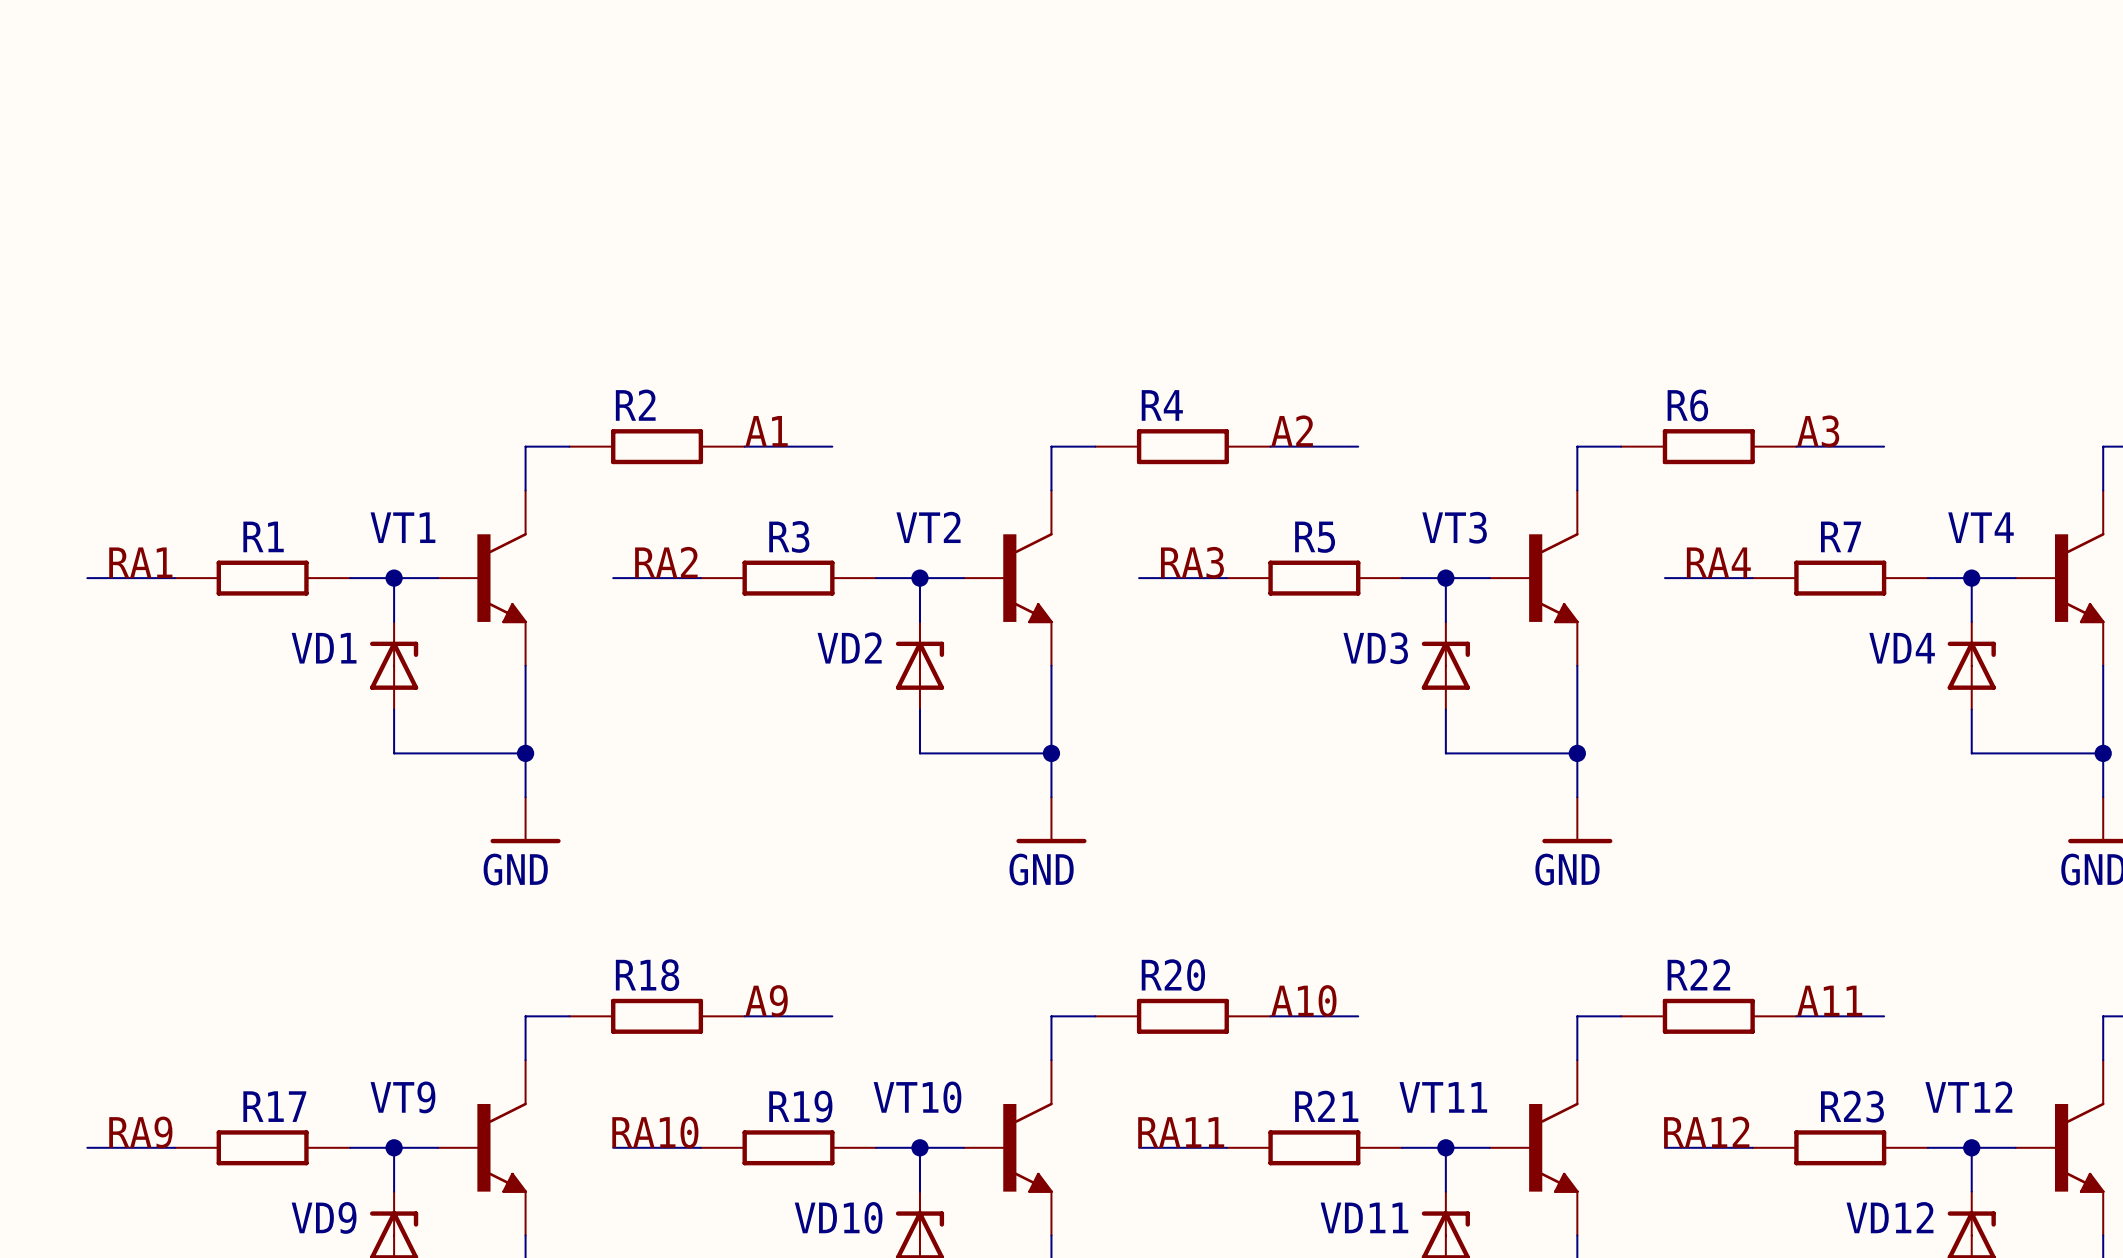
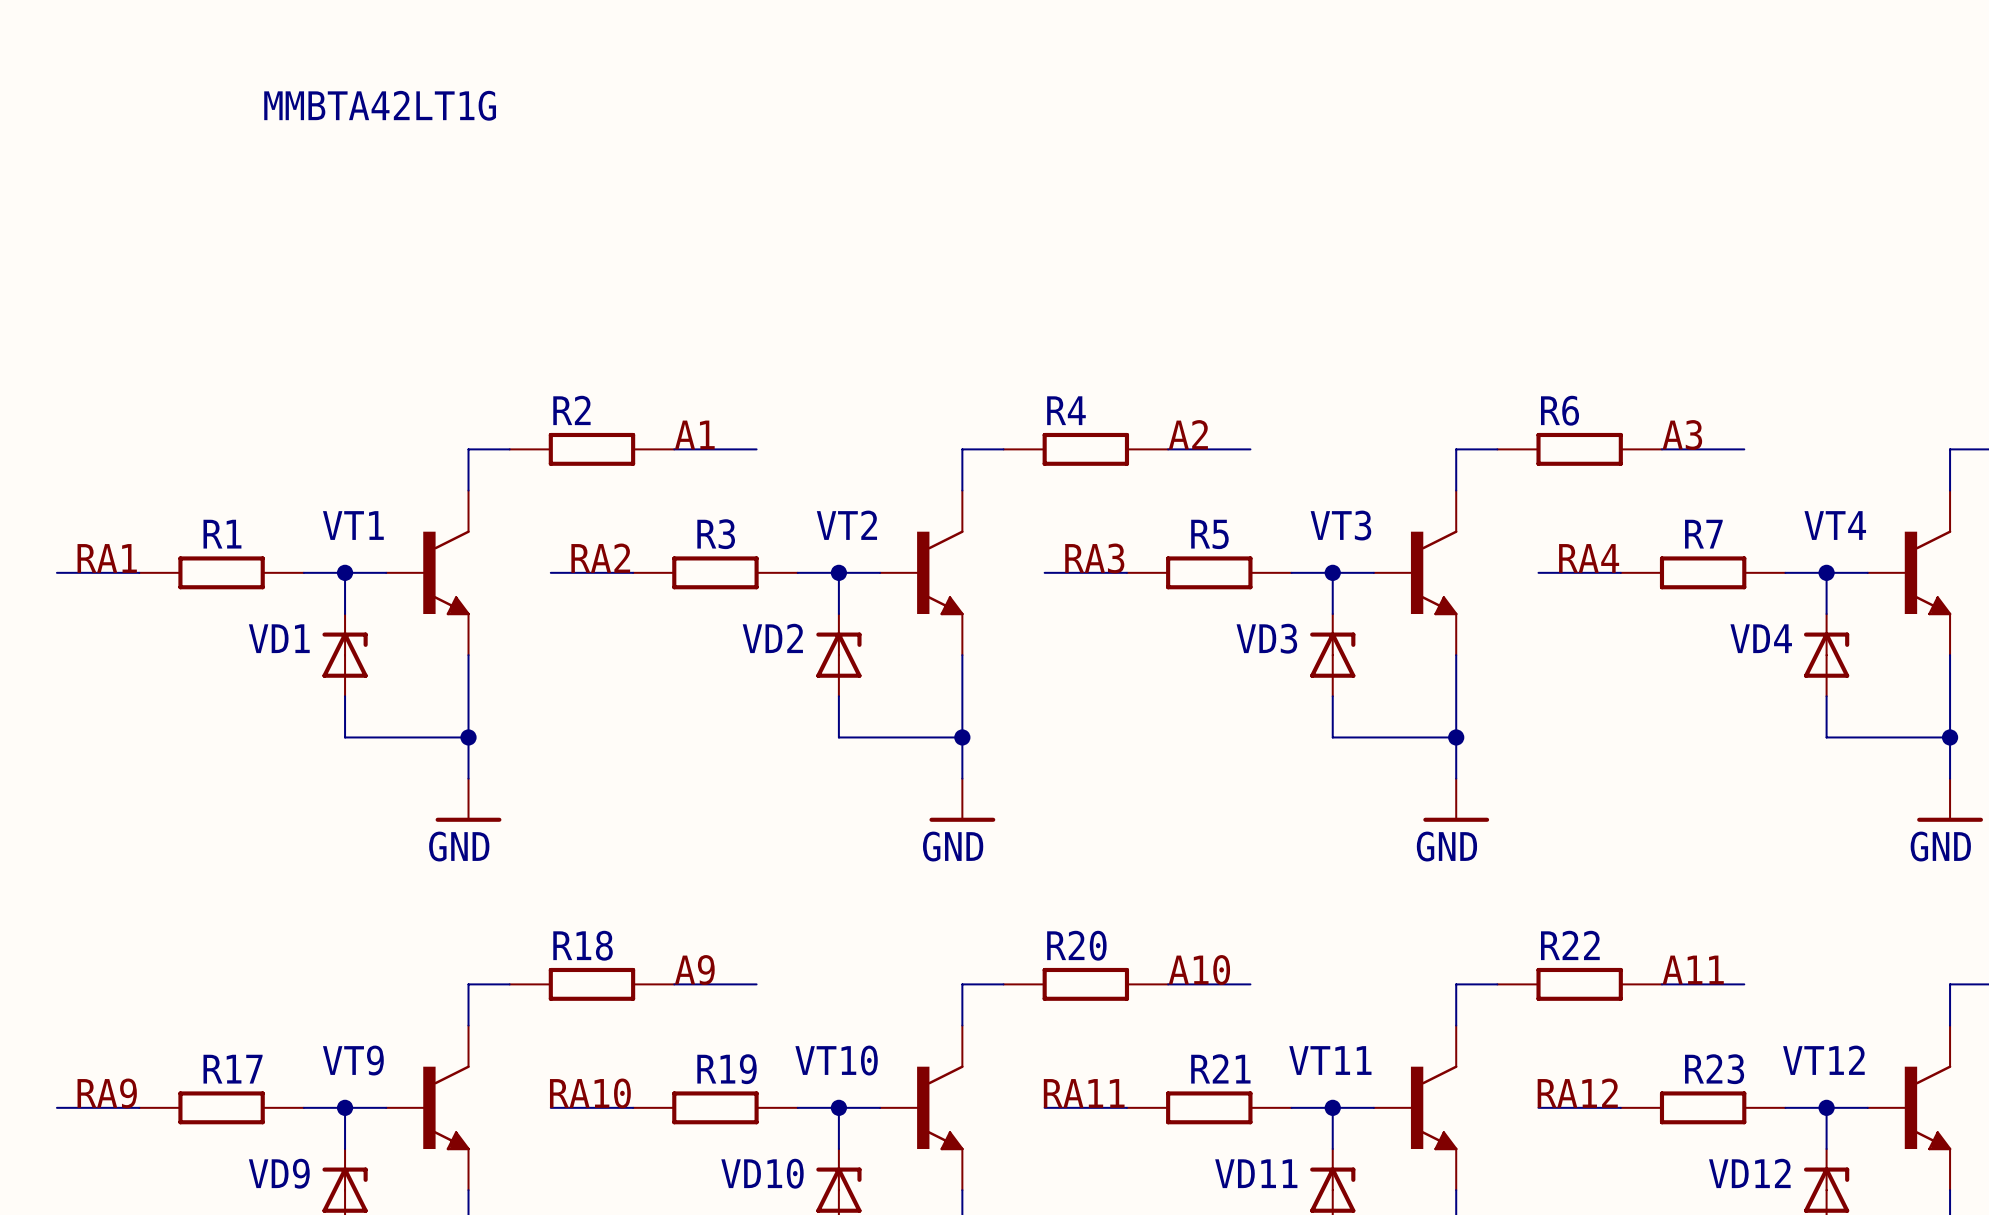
text: none -> MMBTA42LT1G (380, 105)

